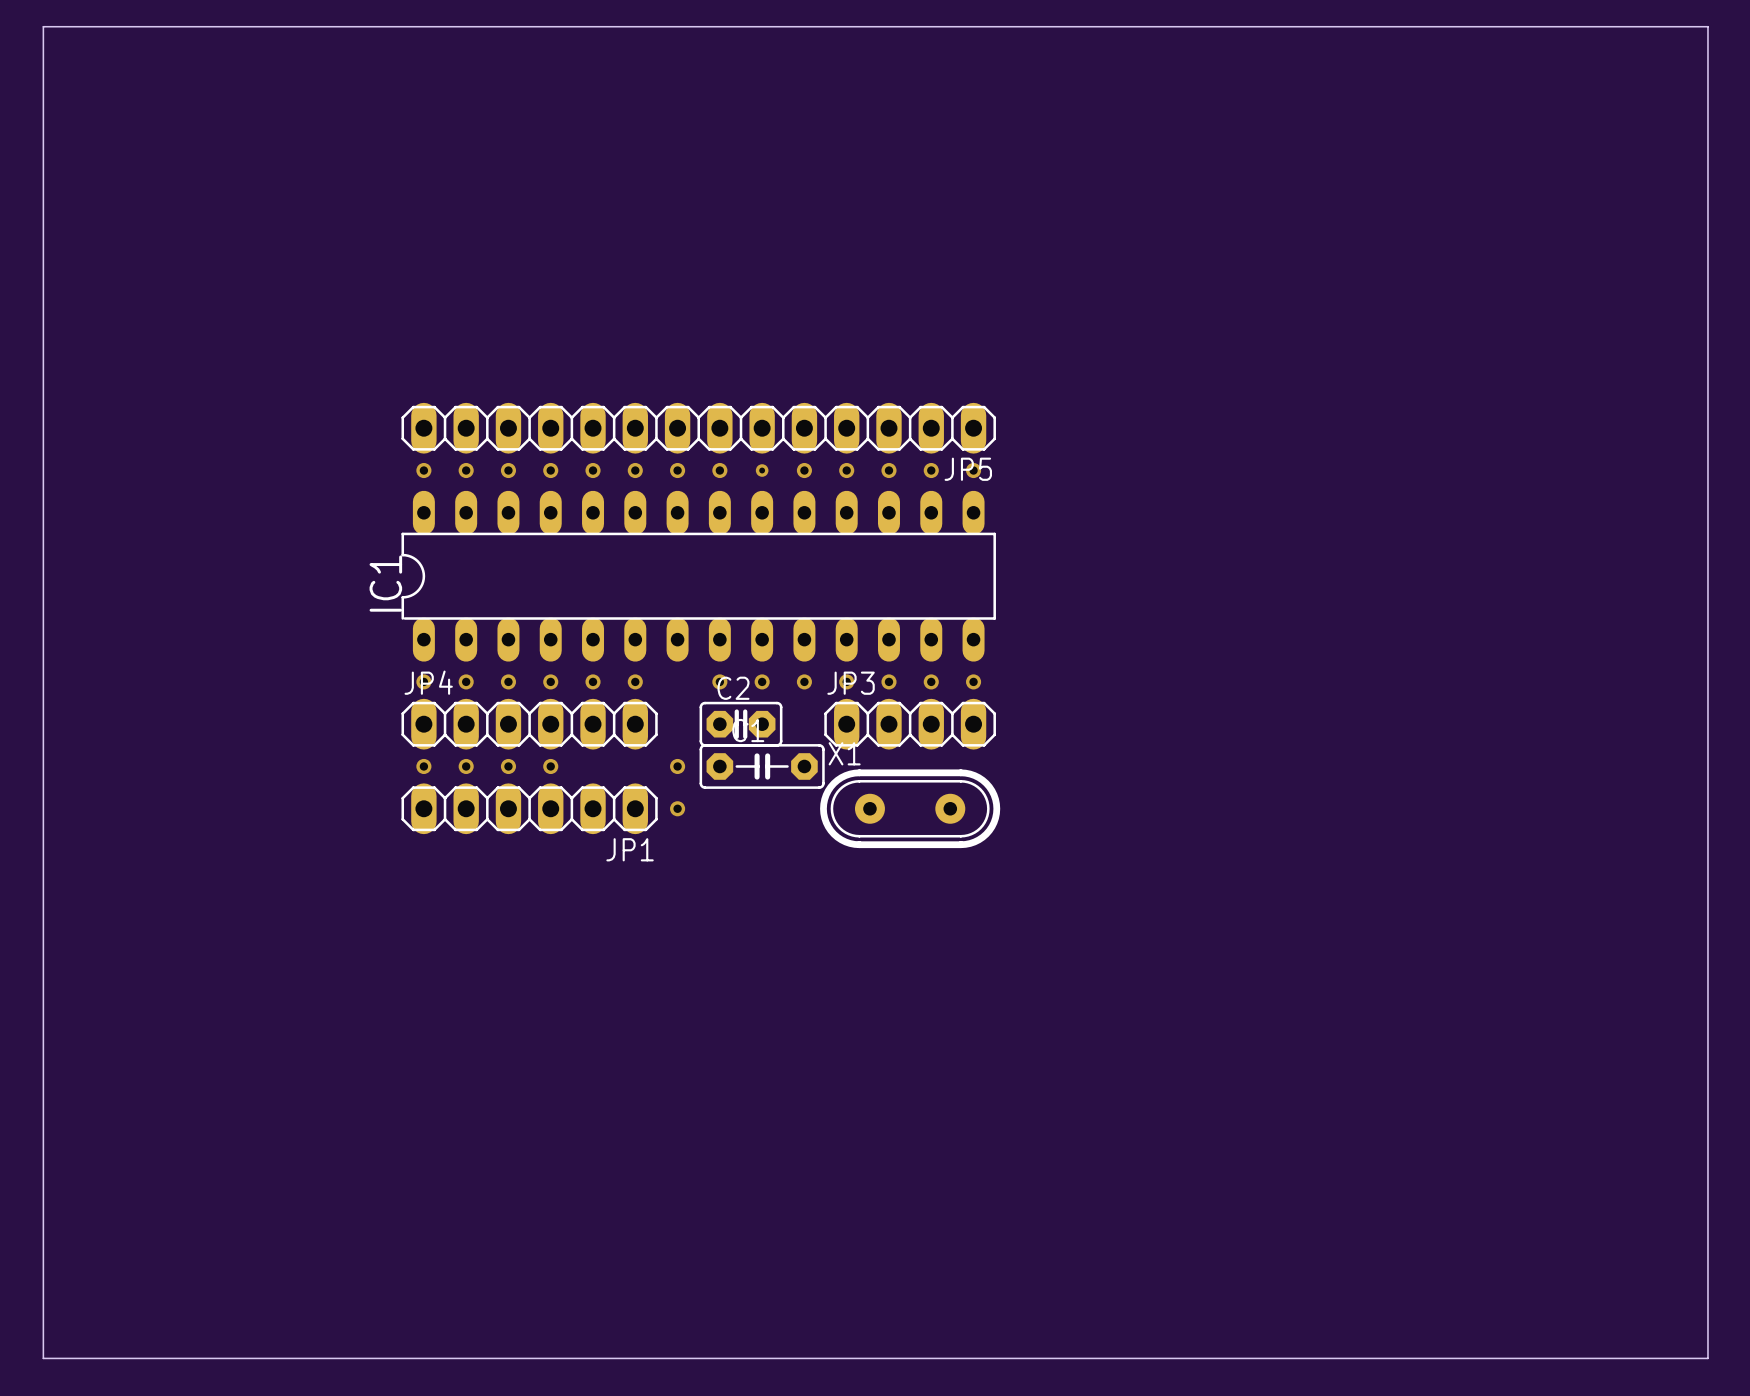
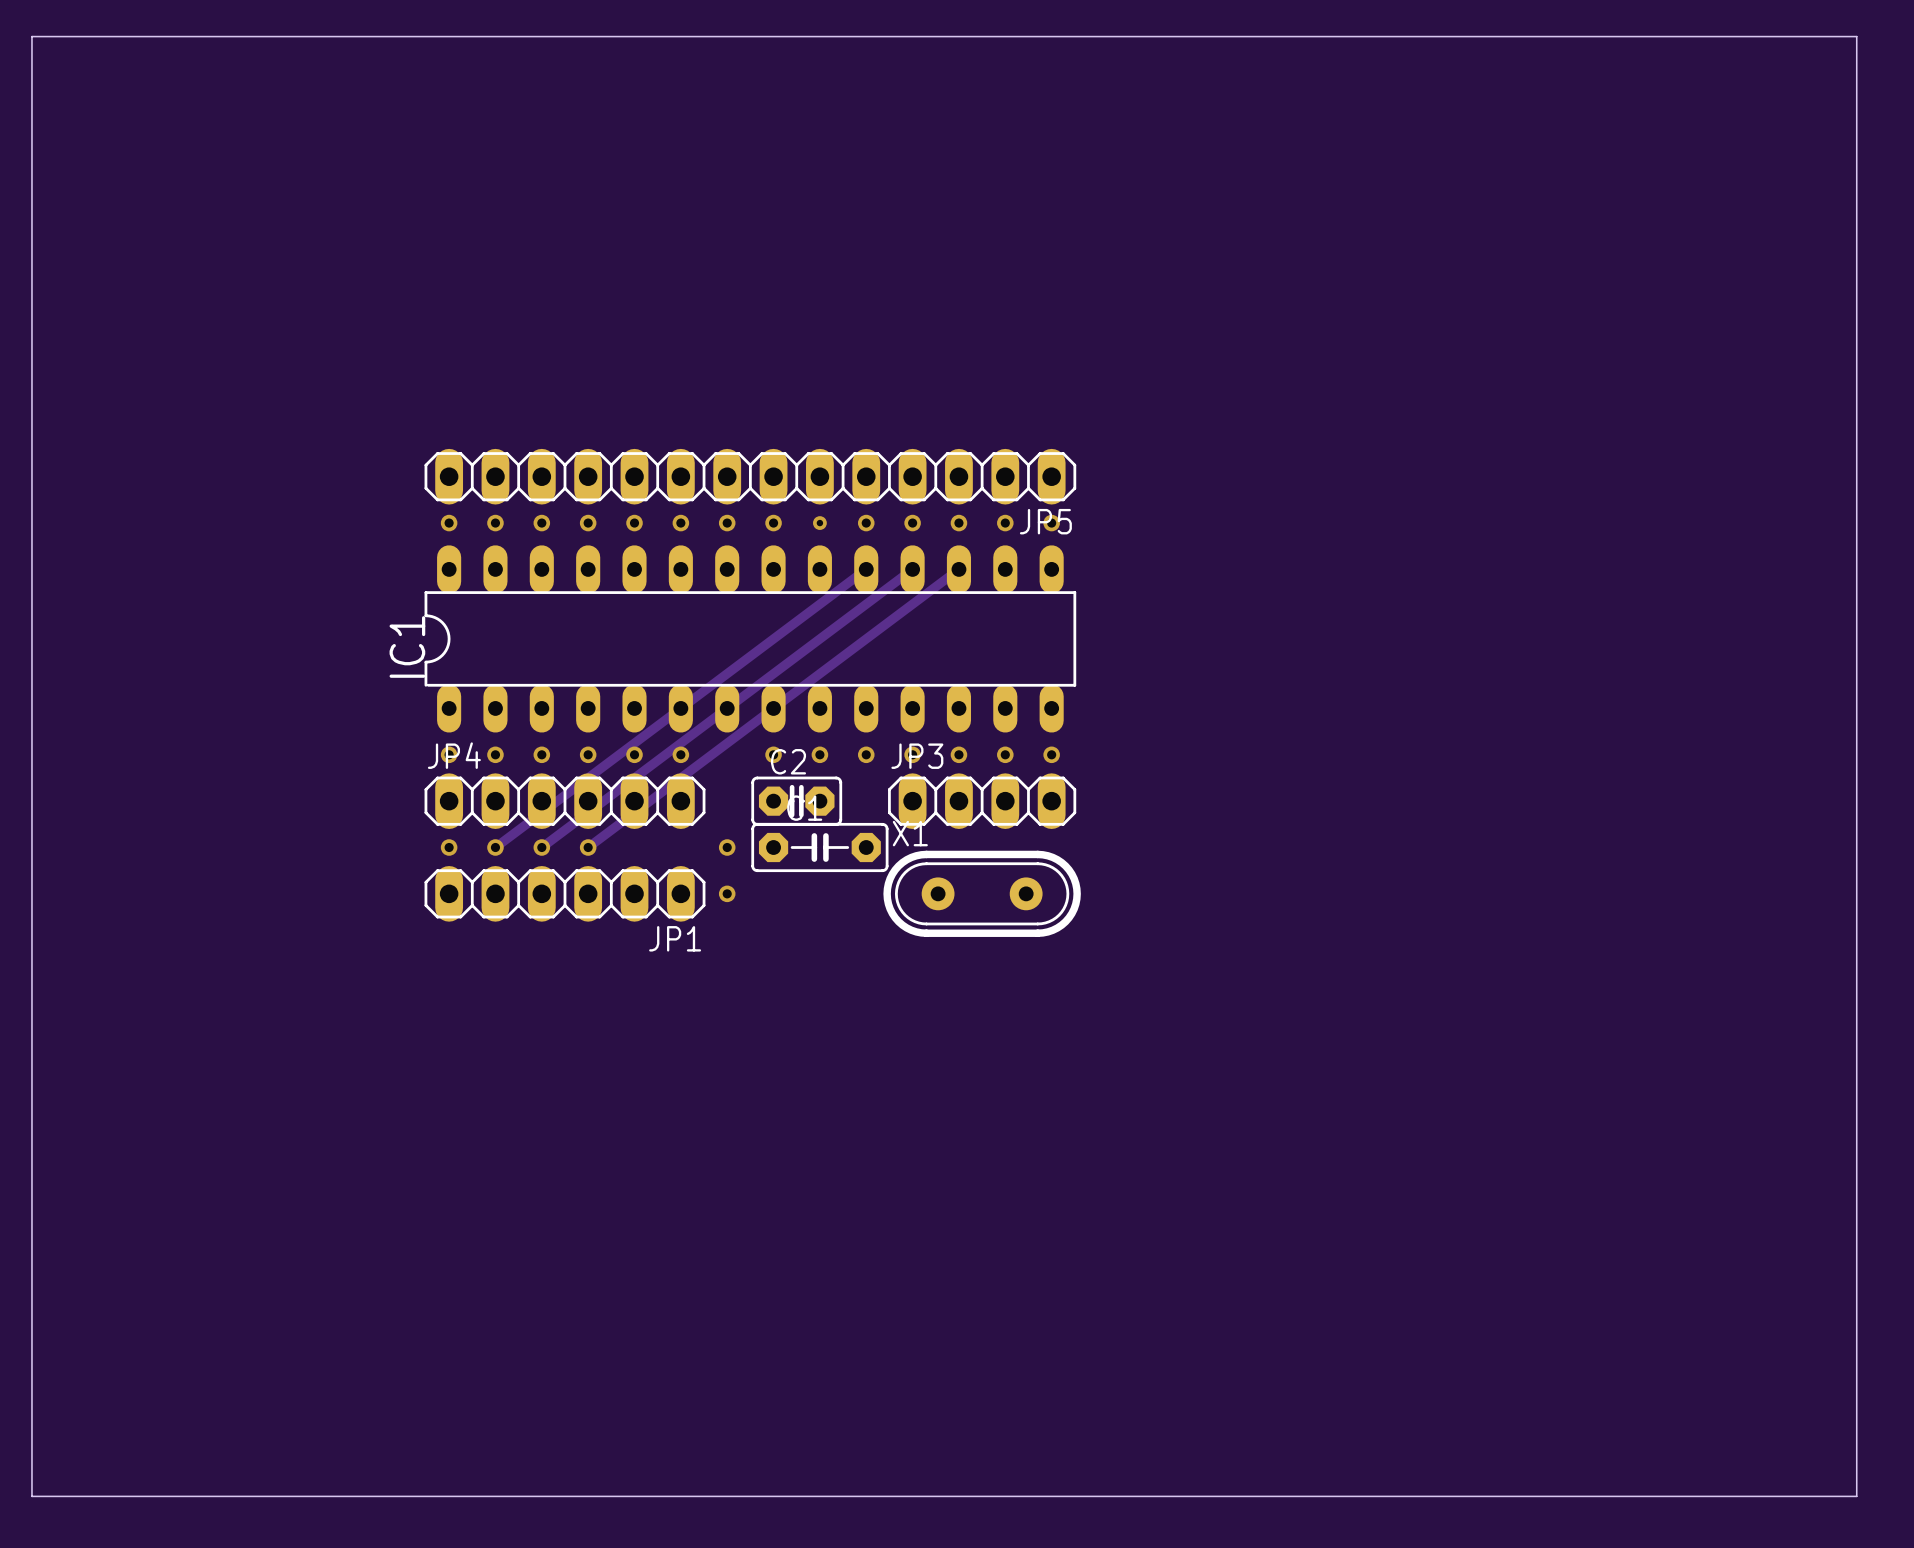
track: none -> (866, 569) (495, 847)
track: none -> (912, 569) (541, 847)
track: none -> (958, 569) (588, 847)

